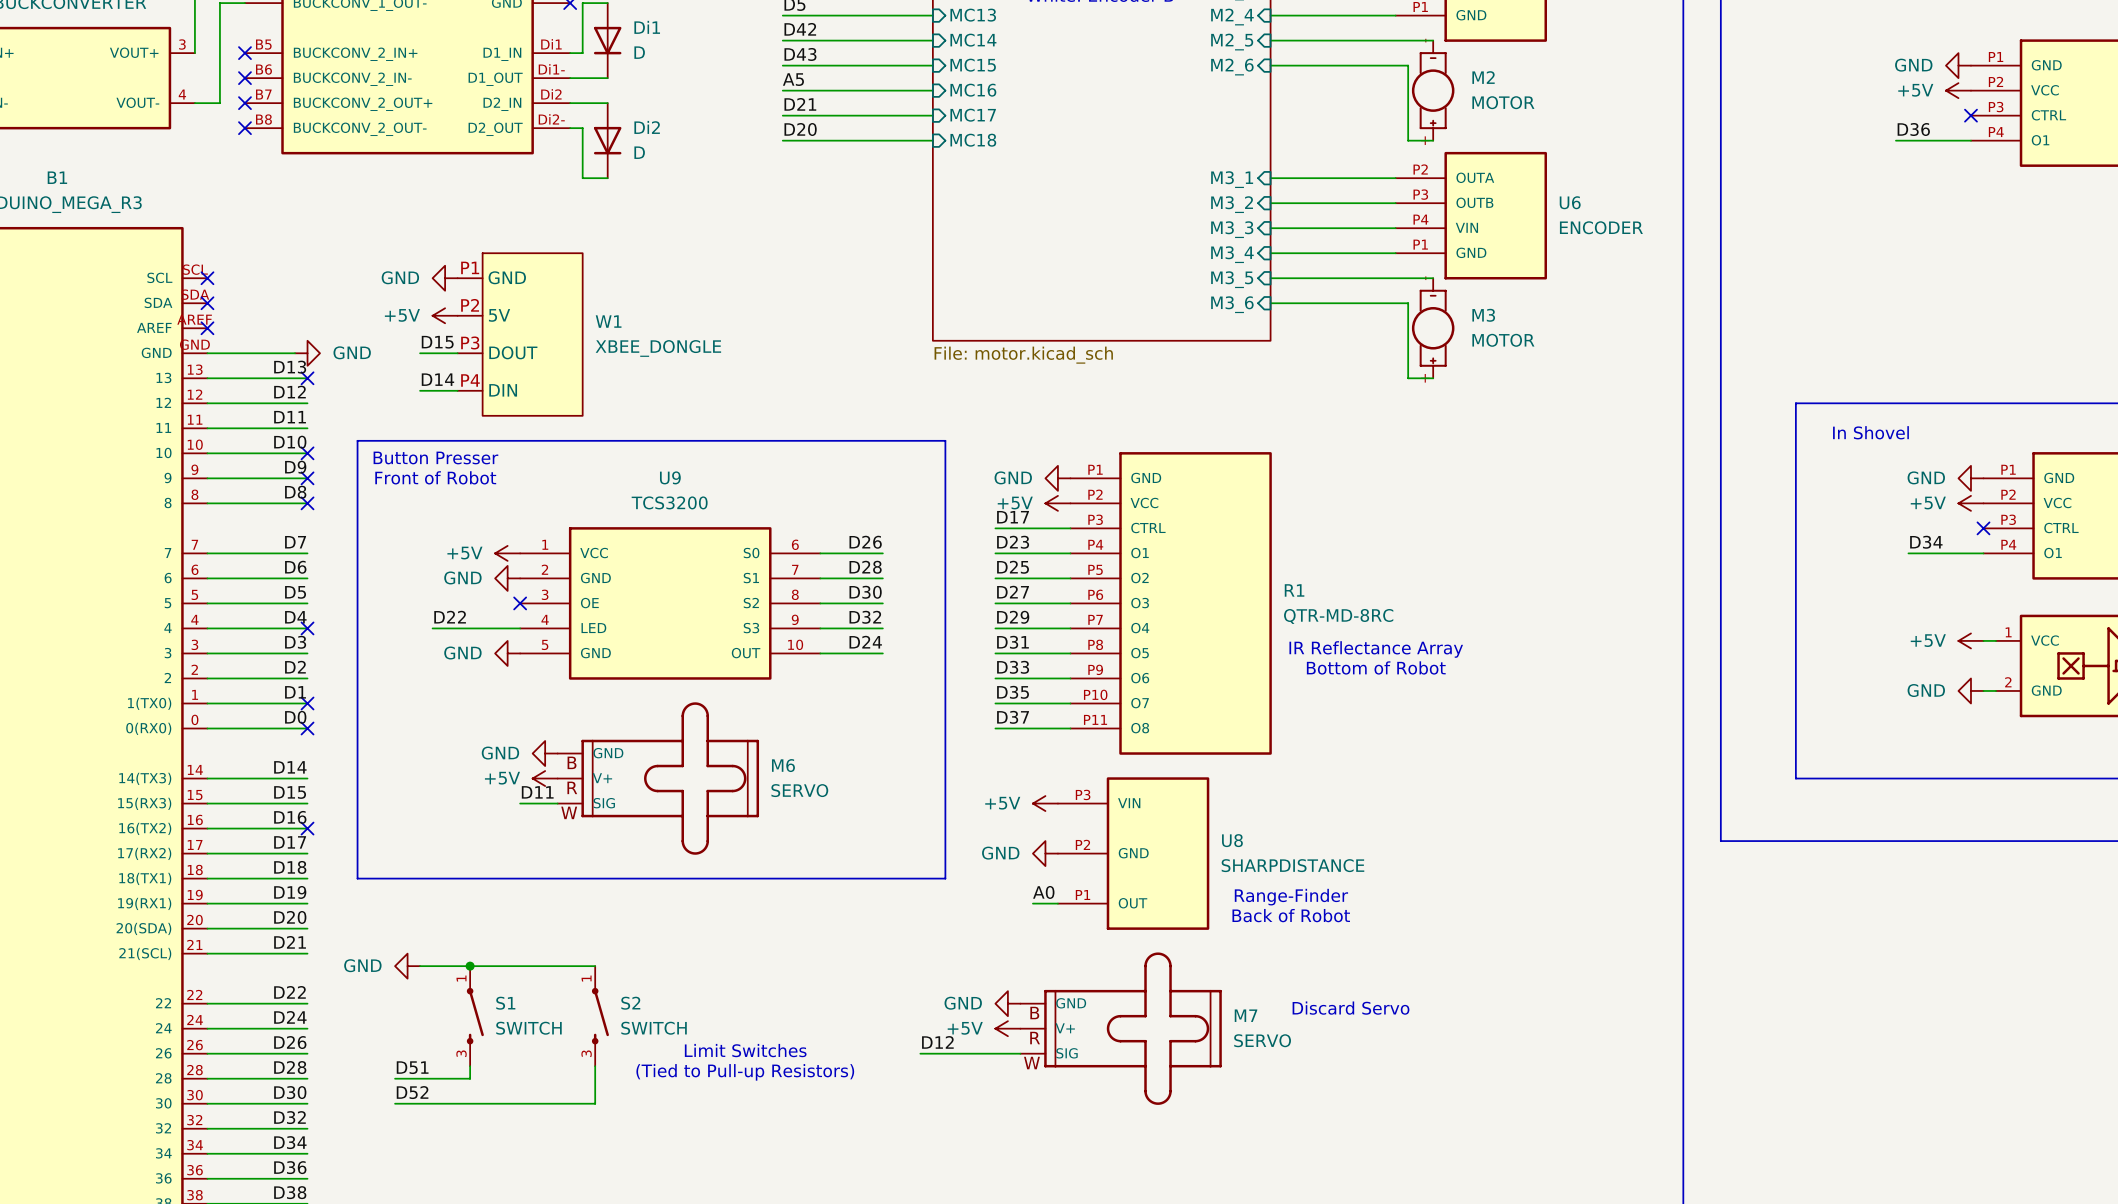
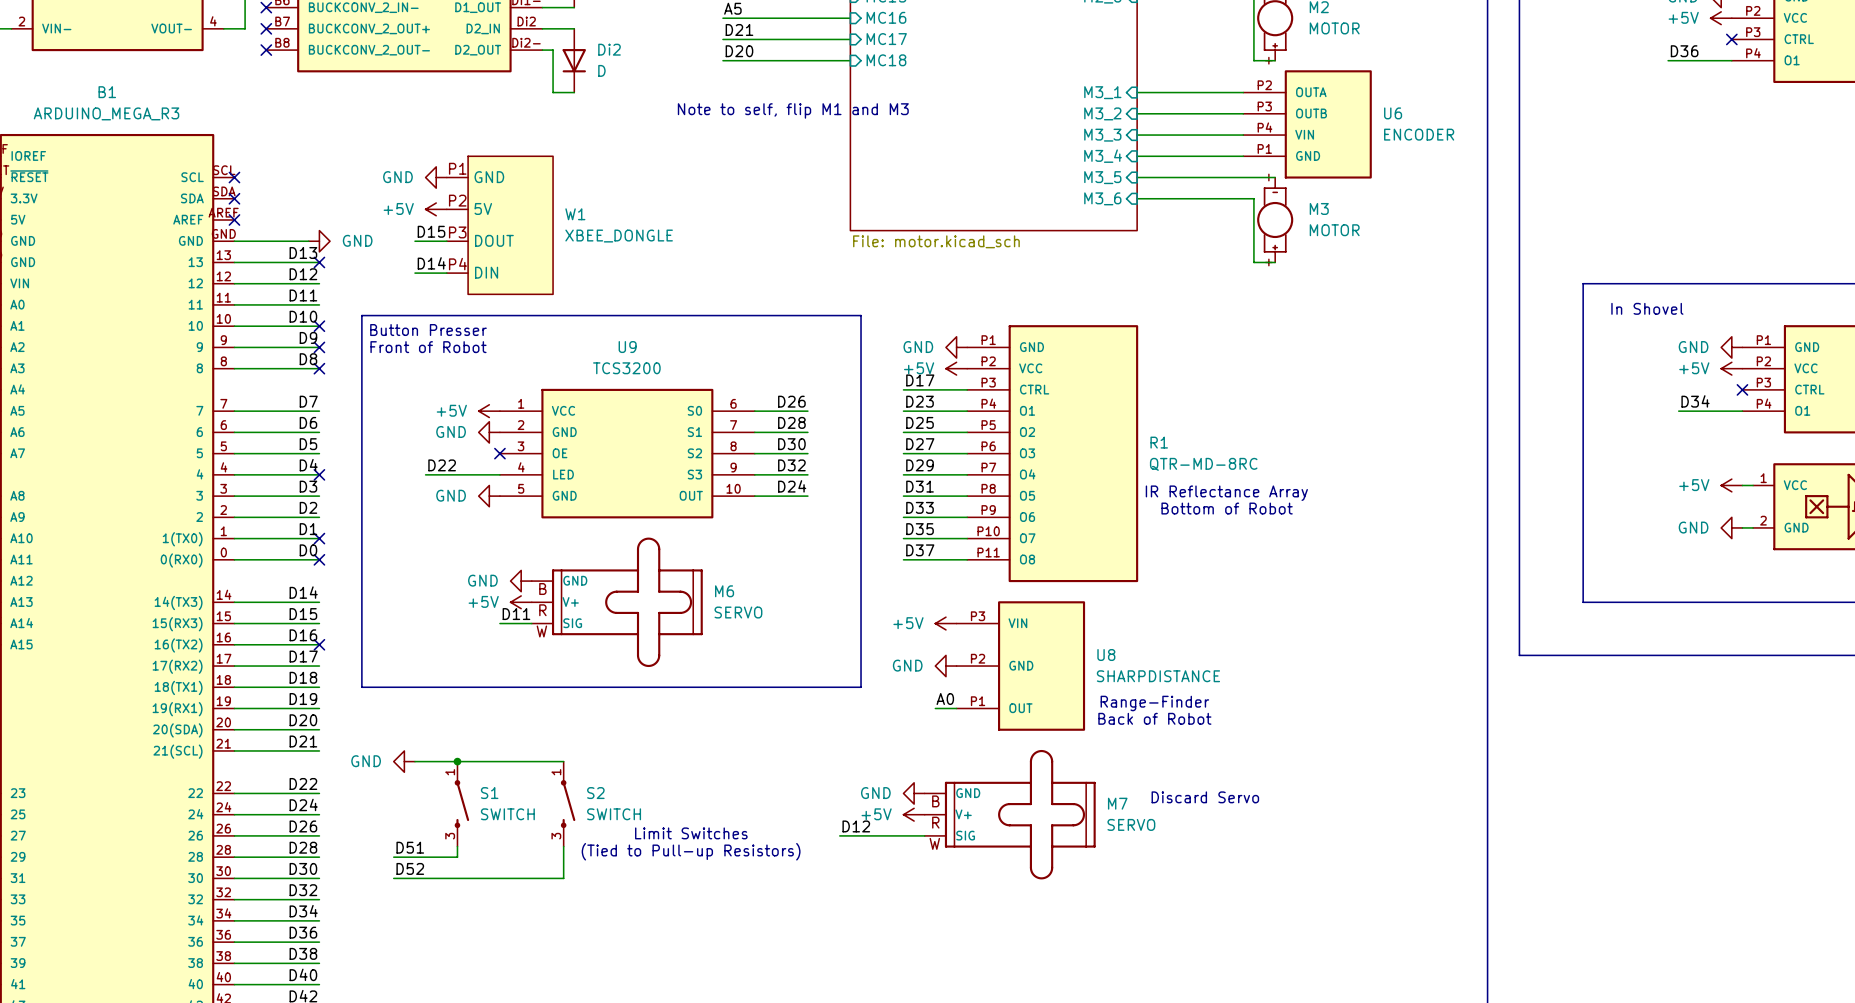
text: none -> Note to self, flip M1 and M3 (793, 110)

